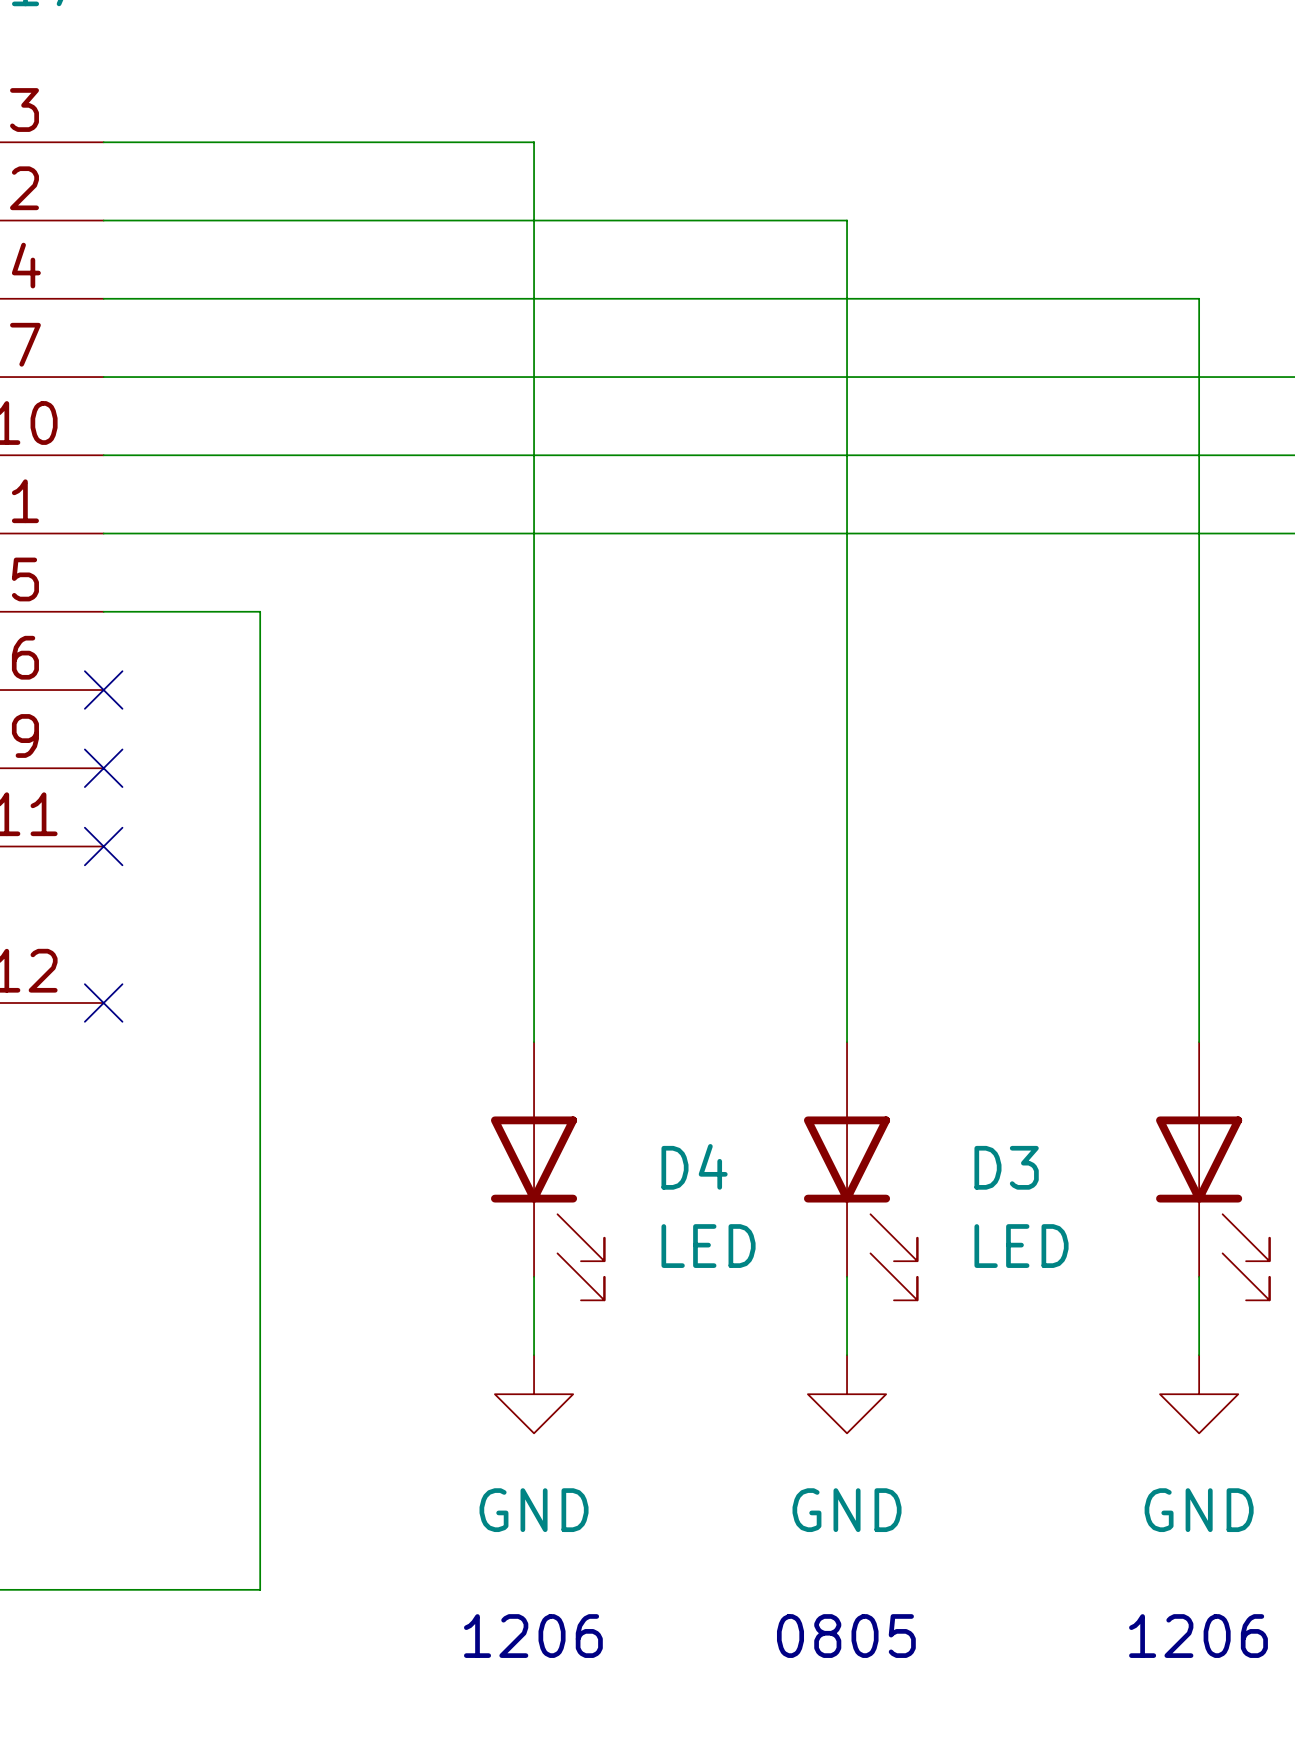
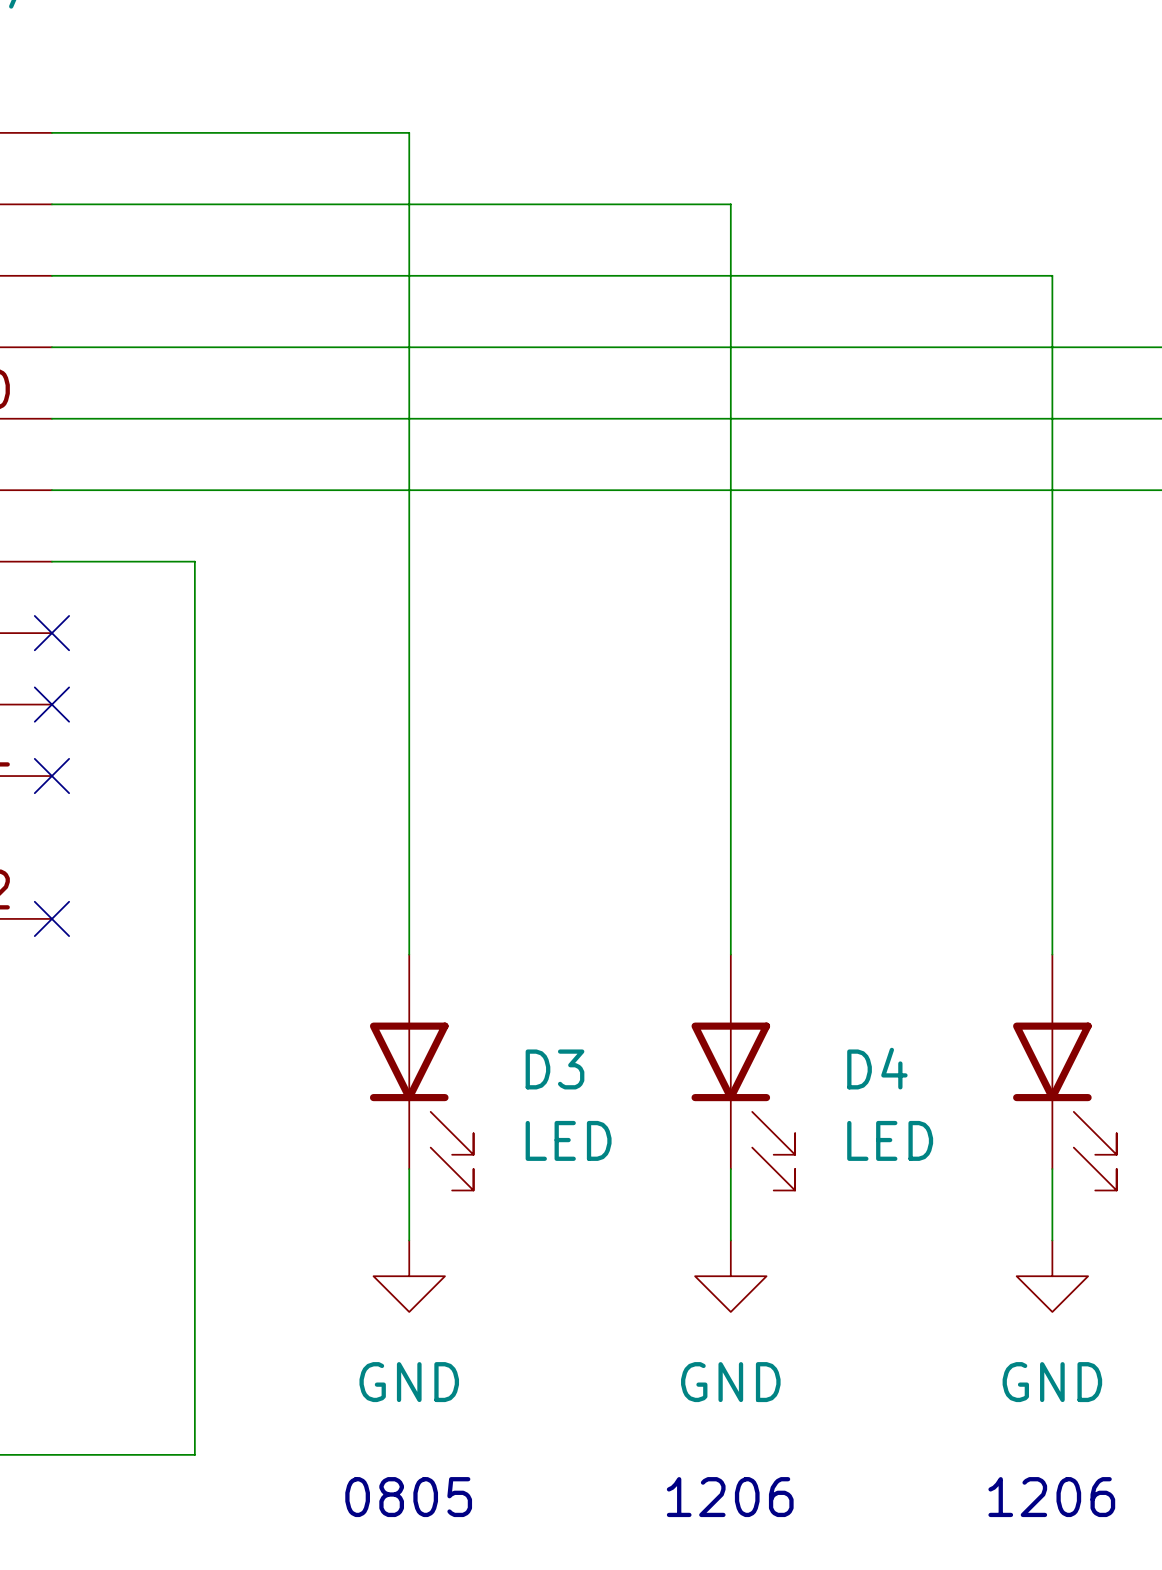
wire: (494, 142) (534, 142) (534, 1042) -> (409, 132) (409, 954)
D3 name: D3 (1006, 1167) -> D4 (877, 1068)
D3: none -> LED (421, 1072)
D4: LED (547, 1171) -> none
wire: (534, 1276) (534, 1355) -> (409, 1169) (409, 1240)
power symbol position: GND (534, 1394) -> GND (409, 1276)
text: none -> 0805 (408, 1497)
text: 1206 (533, 1636) -> none
text: 0805 (846, 1636) -> 1206 (730, 1497)

